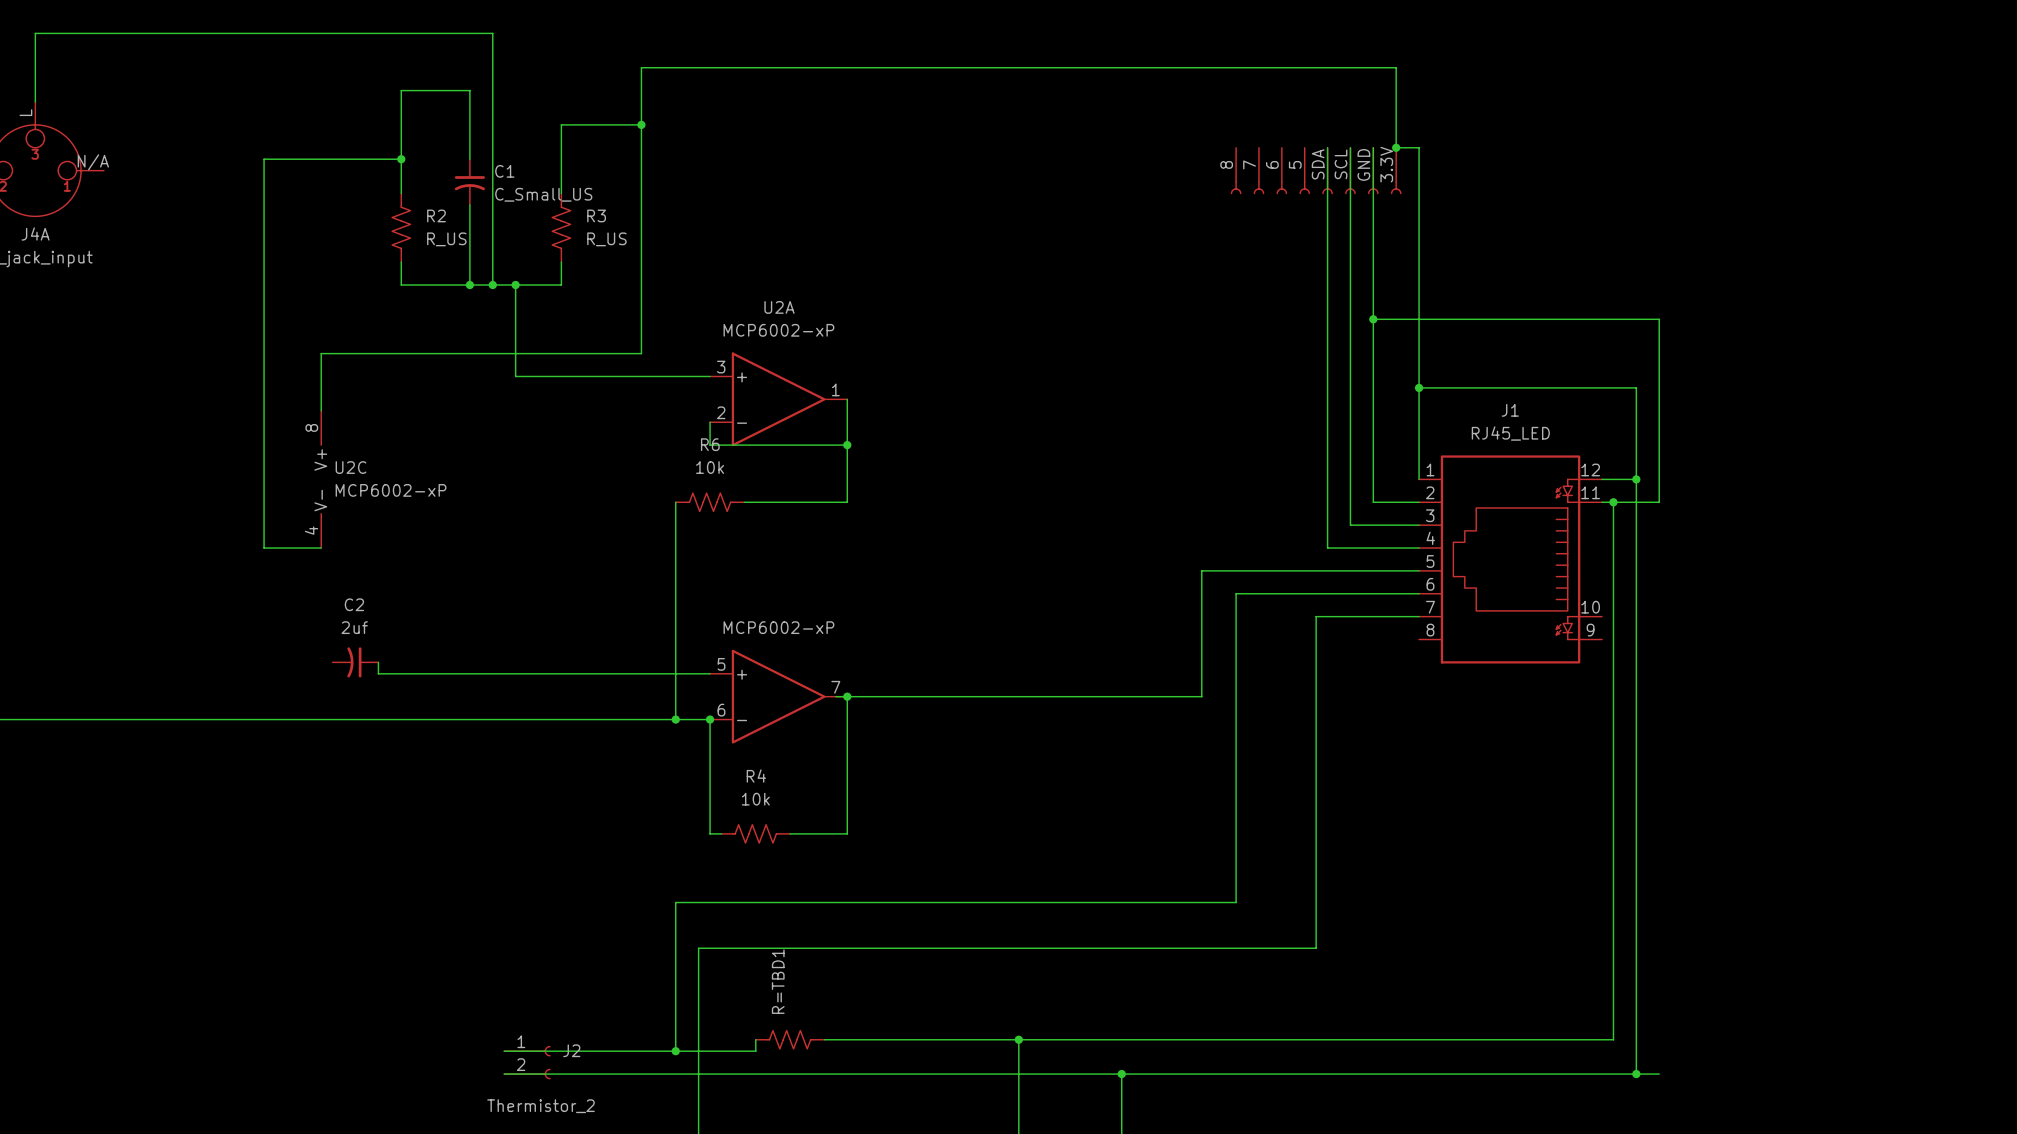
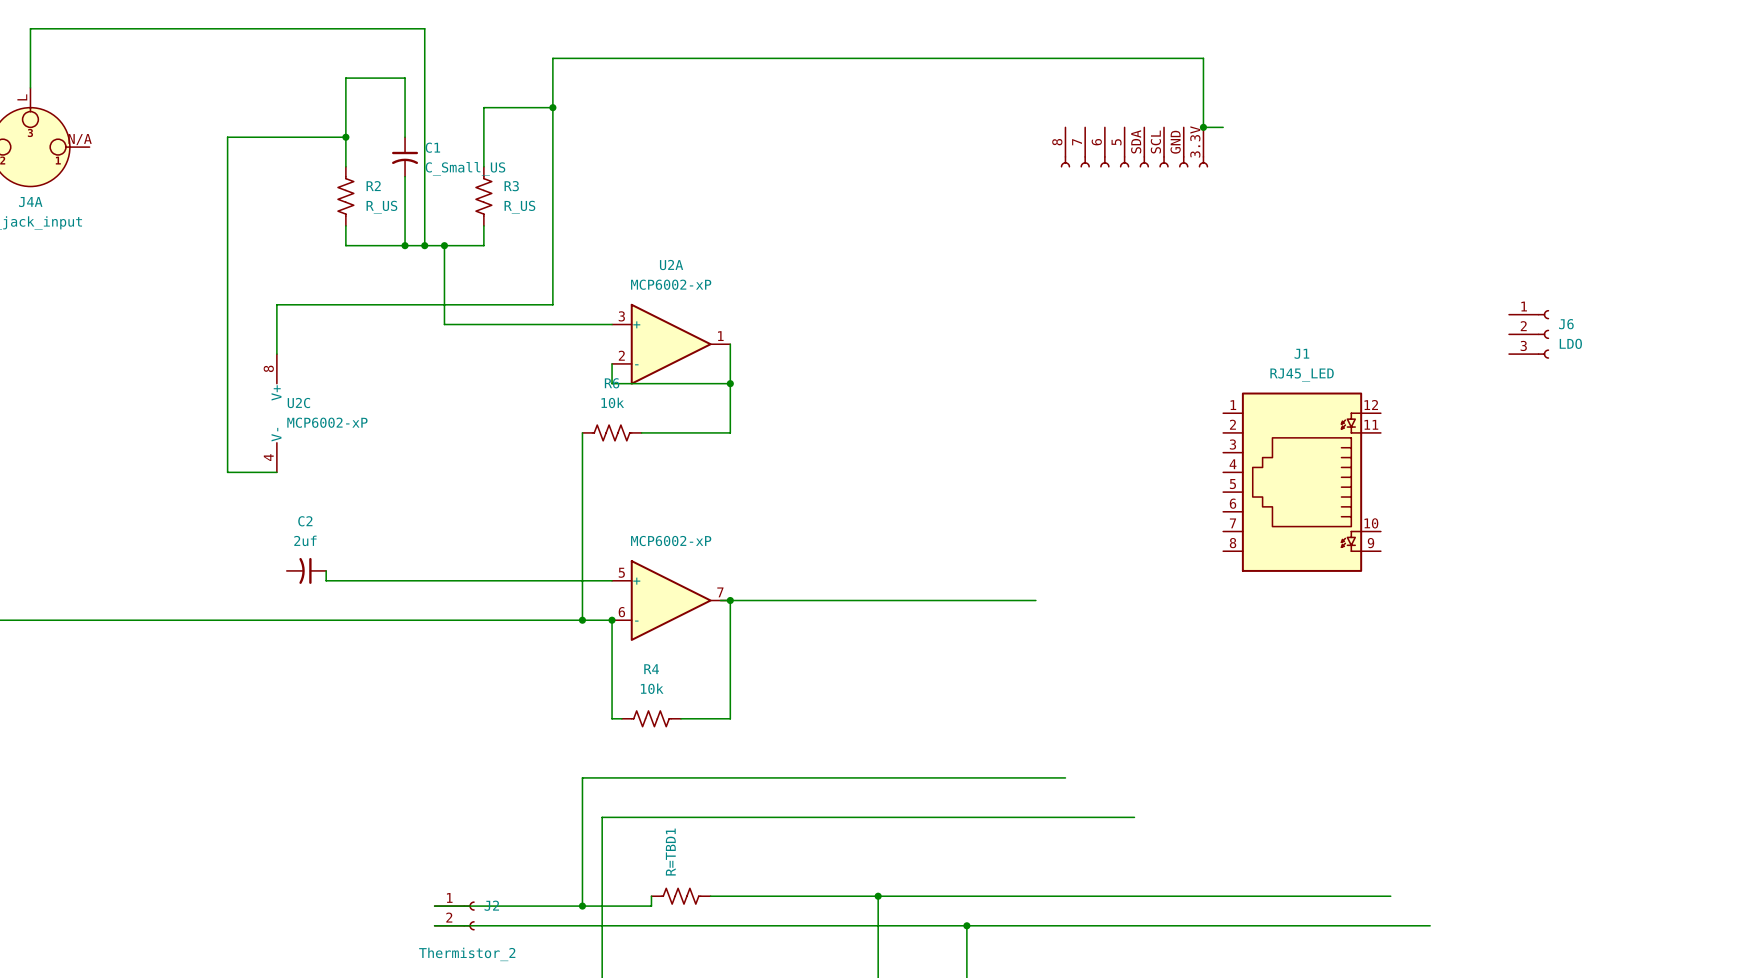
wire: (1327, 147) (1327, 548) (1419, 548) -> none
wire: (1350, 147) (1350, 525) (1419, 525) -> none
wire: (1373, 147) (1373, 502) (1419, 502) -> none
wire: (1419, 147) (1419, 479) -> none
wire: (1373, 319) (1659, 319) (1659, 502) (1602, 502) -> none
junction: (1373, 319) -> none
wire: (1419, 387) (1636, 387) (1636, 1074) -> none
junction: (1419, 387) -> none
J6: none -> LDO (1529, 334)
wire: (1602, 479) (1636, 479) -> none
junction: (1636, 479) -> none
wire: (1613, 502) (1613, 1039) -> none
junction: (1613, 502) -> none
wire: (1419, 570) (1201, 570) (1201, 696) -> none
wire: (1419, 593) (1236, 593) (1236, 902) -> none
wire: (1419, 616) (1316, 616) (1316, 948) -> none
junction: (1636, 1074) -> none

